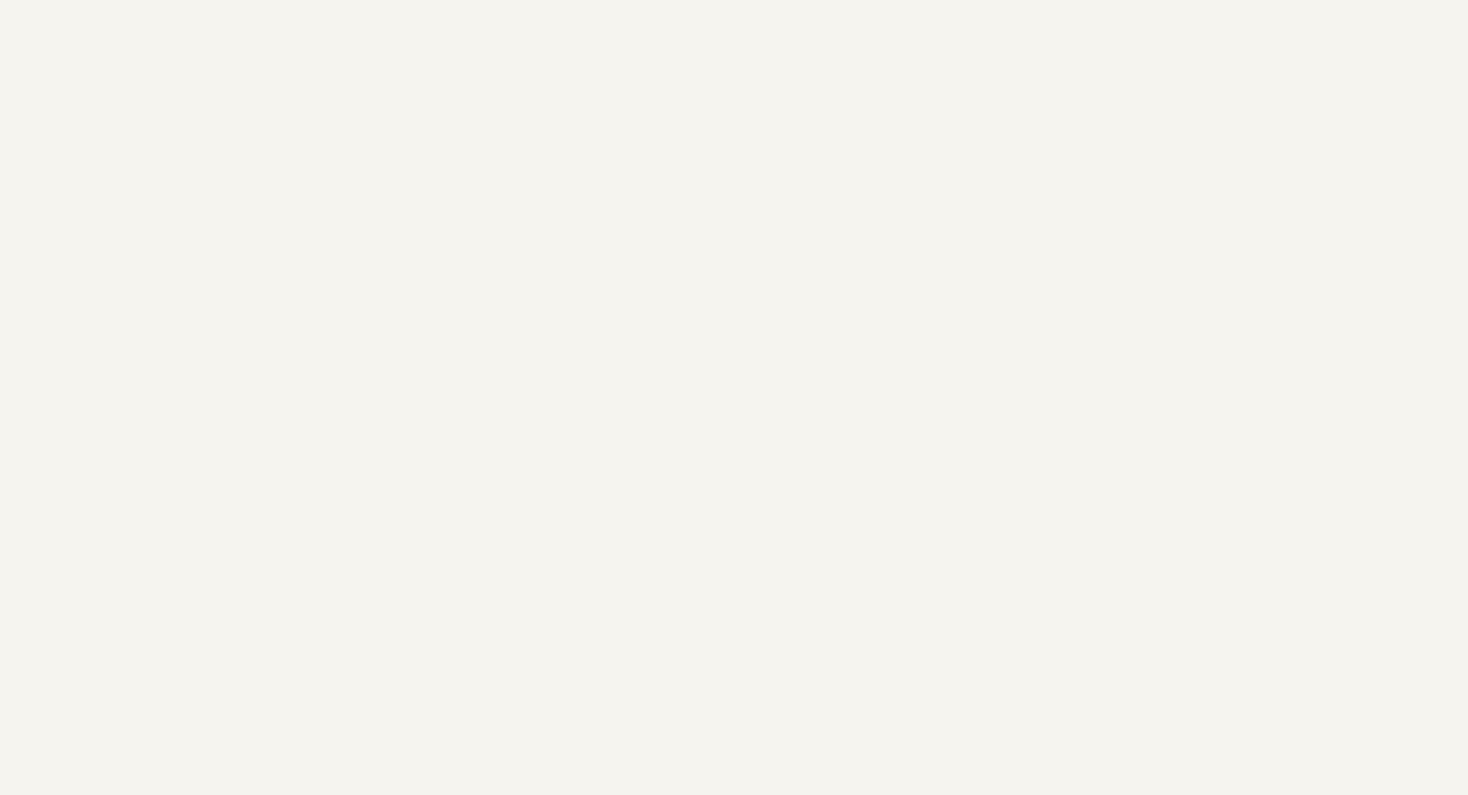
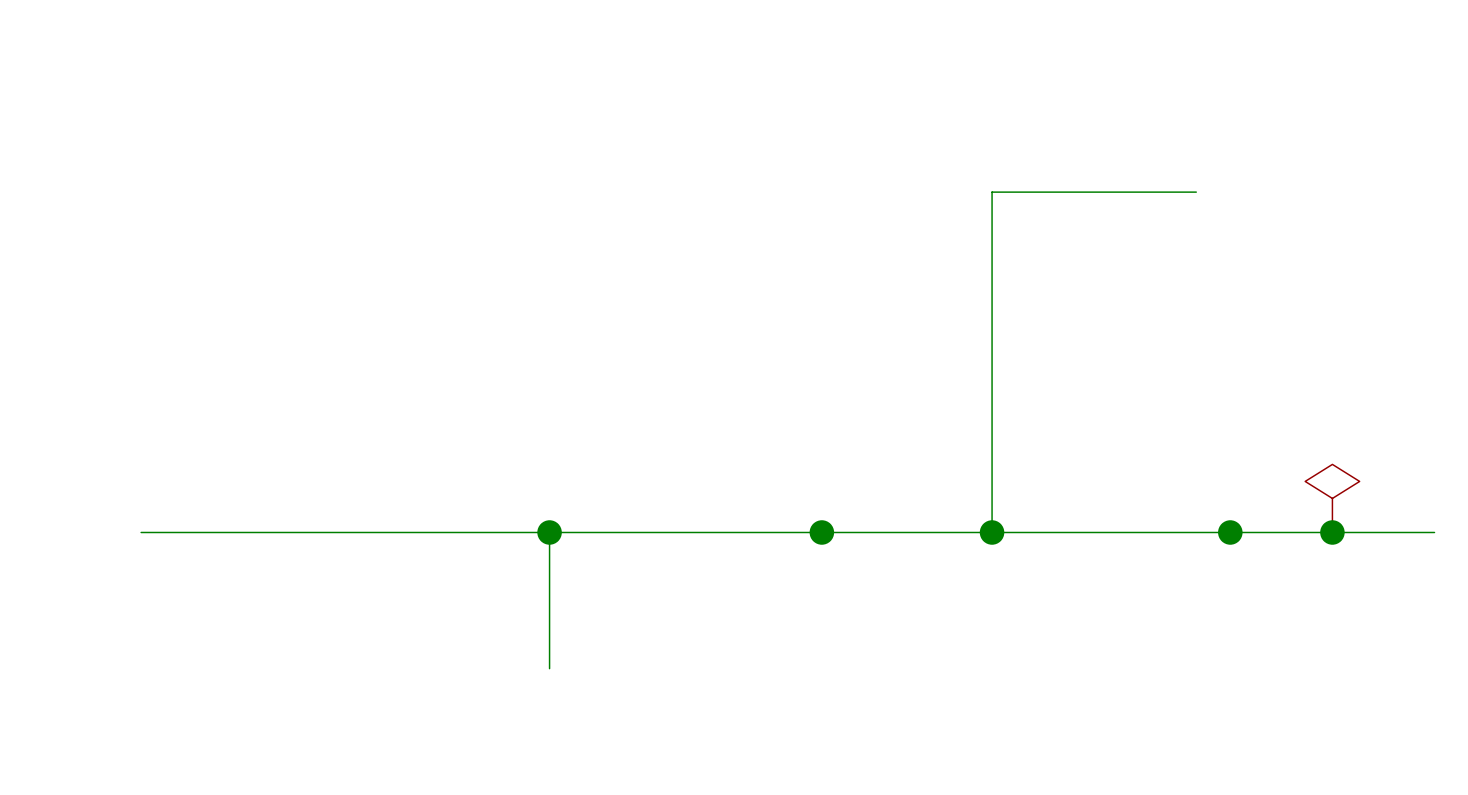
wire: none -> (1196, 192) (992, 192) (992, 532)
power symbol: none -> (1332, 498)
wire: none -> (141, 532) (1434, 532)
wire: none -> (549, 532) (549, 668)
junction: none -> (549, 532)
junction: none -> (821, 532)
junction: none -> (992, 532)
junction: none -> (1230, 532)
junction: none -> (1332, 532)

